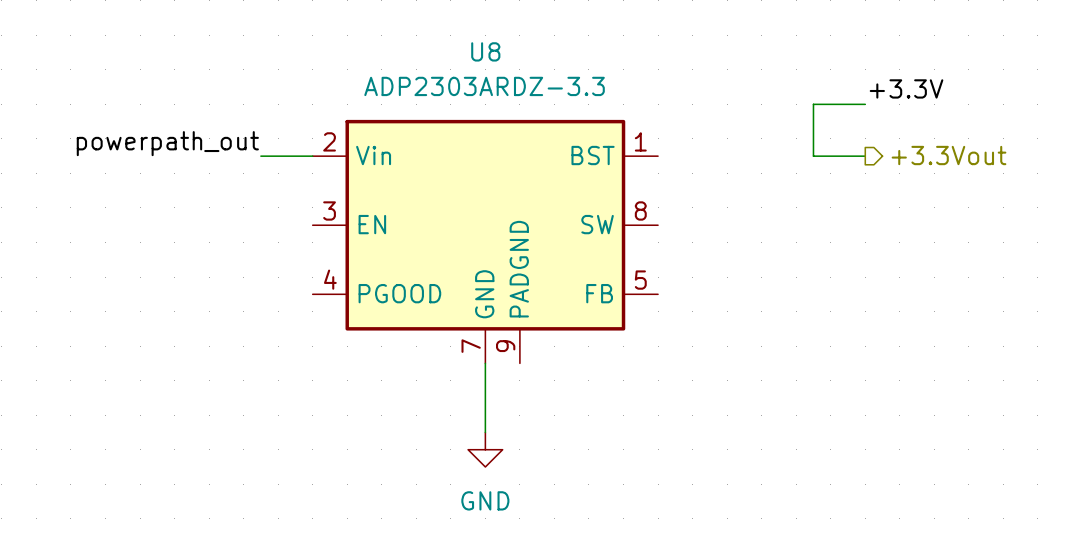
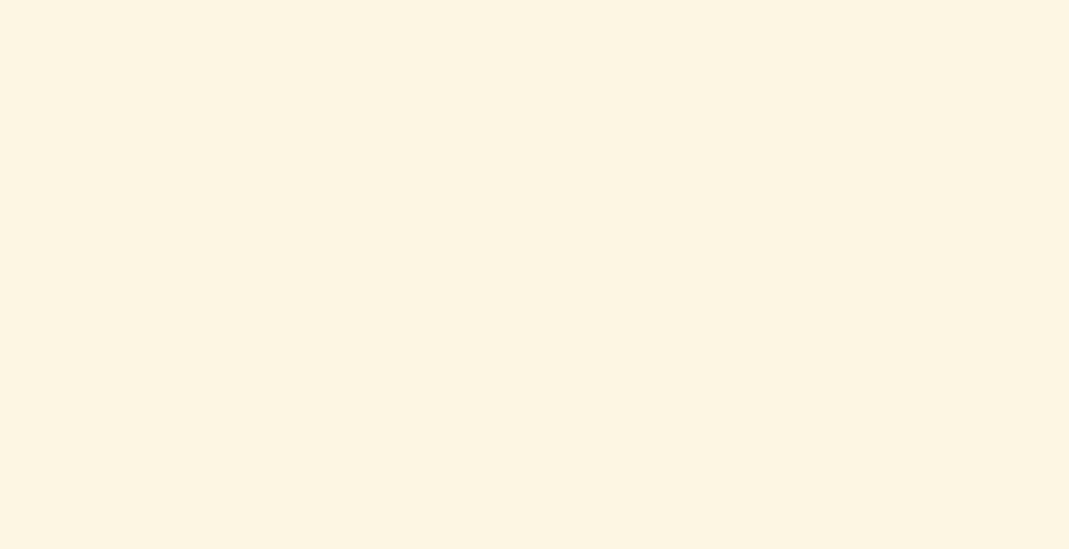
label: +3.3V (906, 88) -> none
wire: (865, 104) (813, 104) (813, 156) (865, 156) -> none
label: powerpath_out (167, 143) -> none
hierarchical label: +3.3Vout (949, 155) -> none
wire: (260, 156) (312, 156) -> none
U8: ADP2303ARDZ-3.3 (485, 241) -> none
wire: (485, 363) (485, 432) -> none
power symbol: GND (485, 449) -> none

